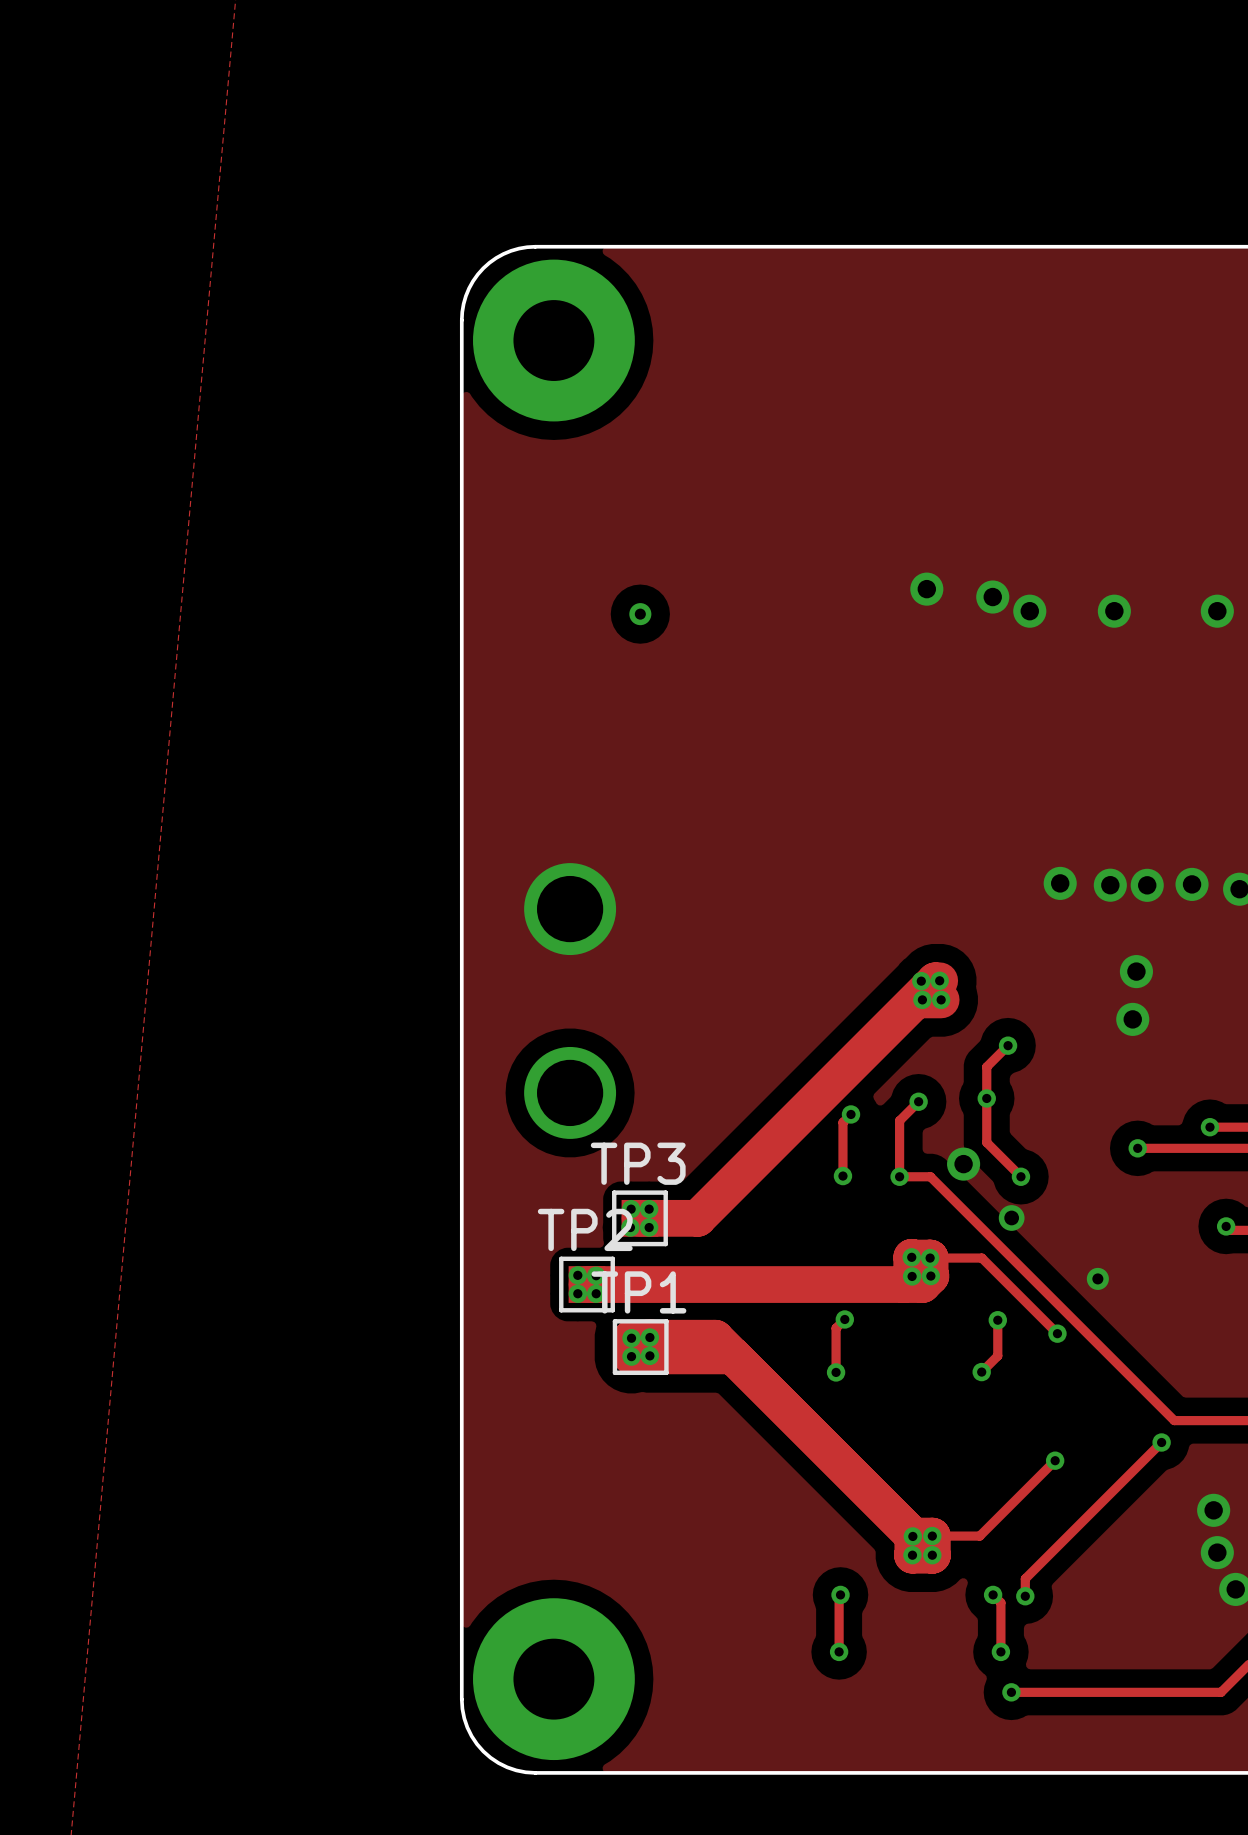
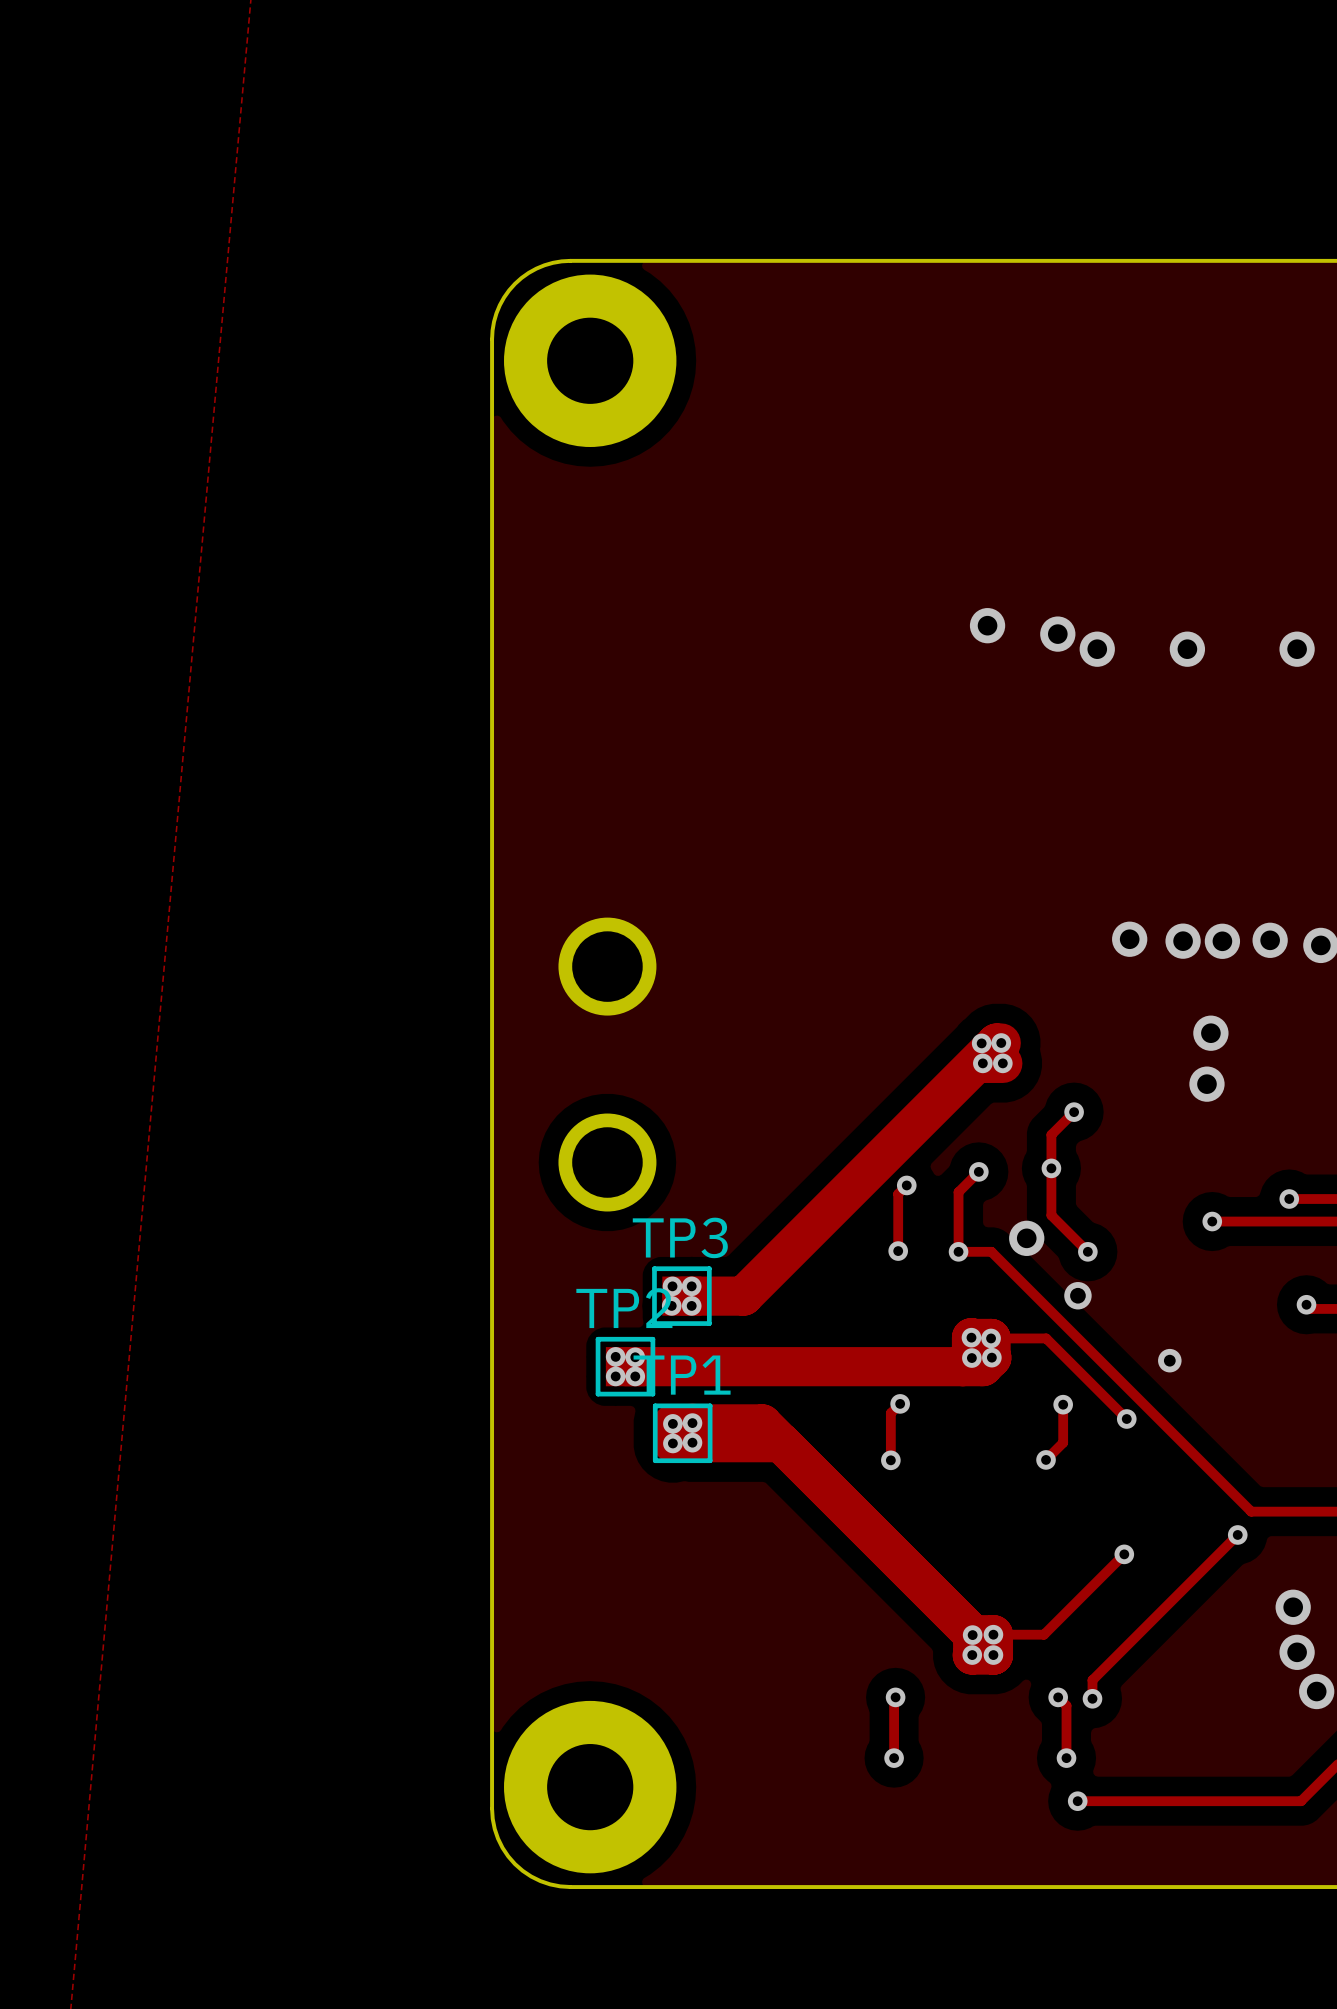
via: (640, 614) -> none

